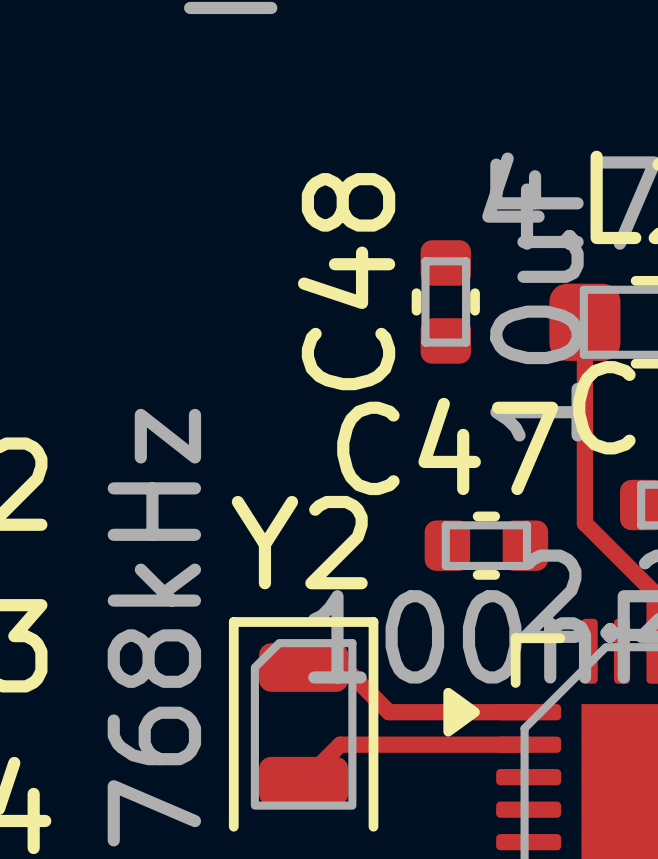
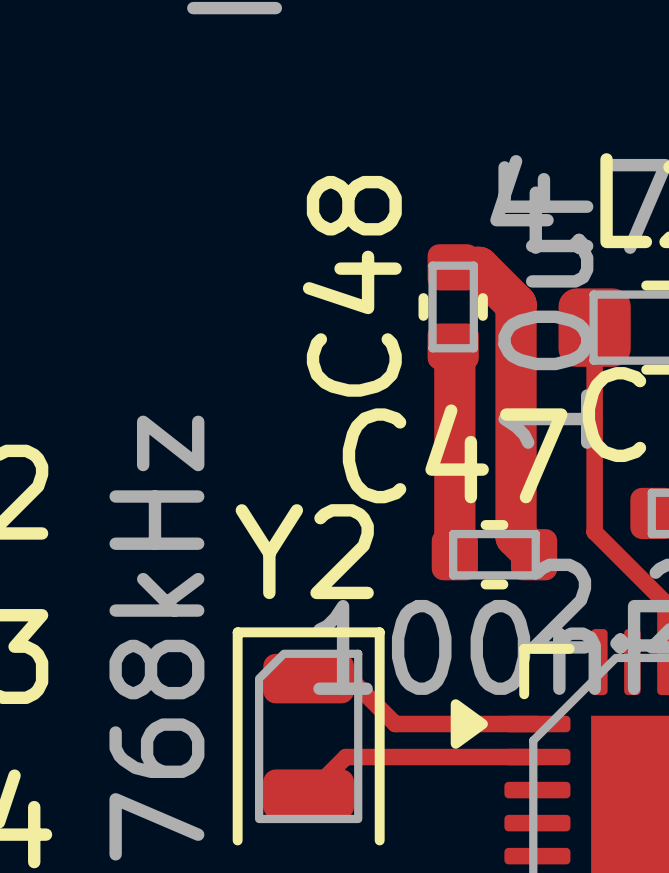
top track: none -> (453, 267) (478, 267) (516, 304) (516, 536) (534, 554)
top track: none -> (453, 346) (454, 348) (454, 554)

